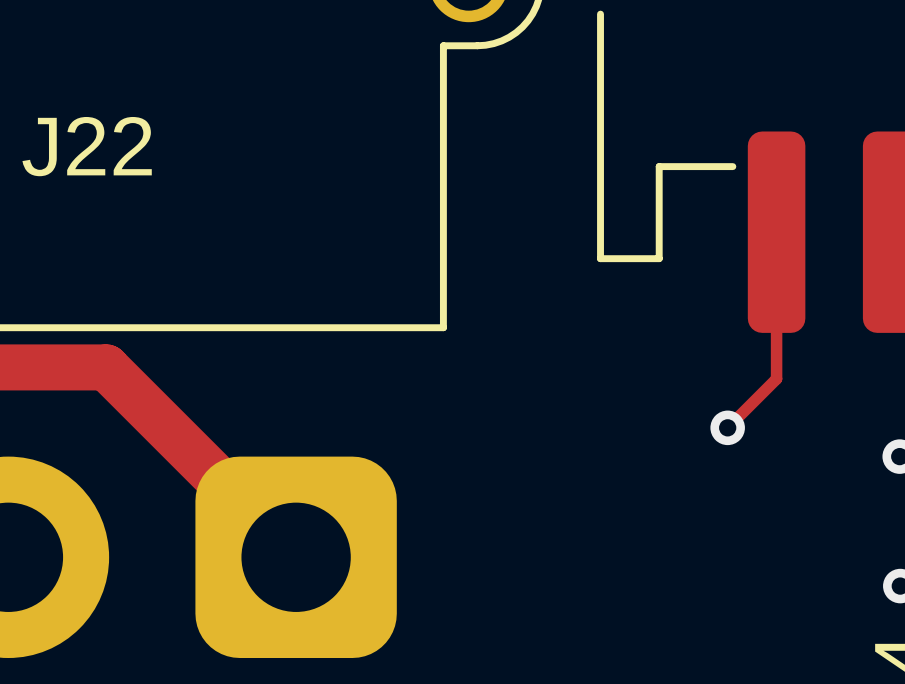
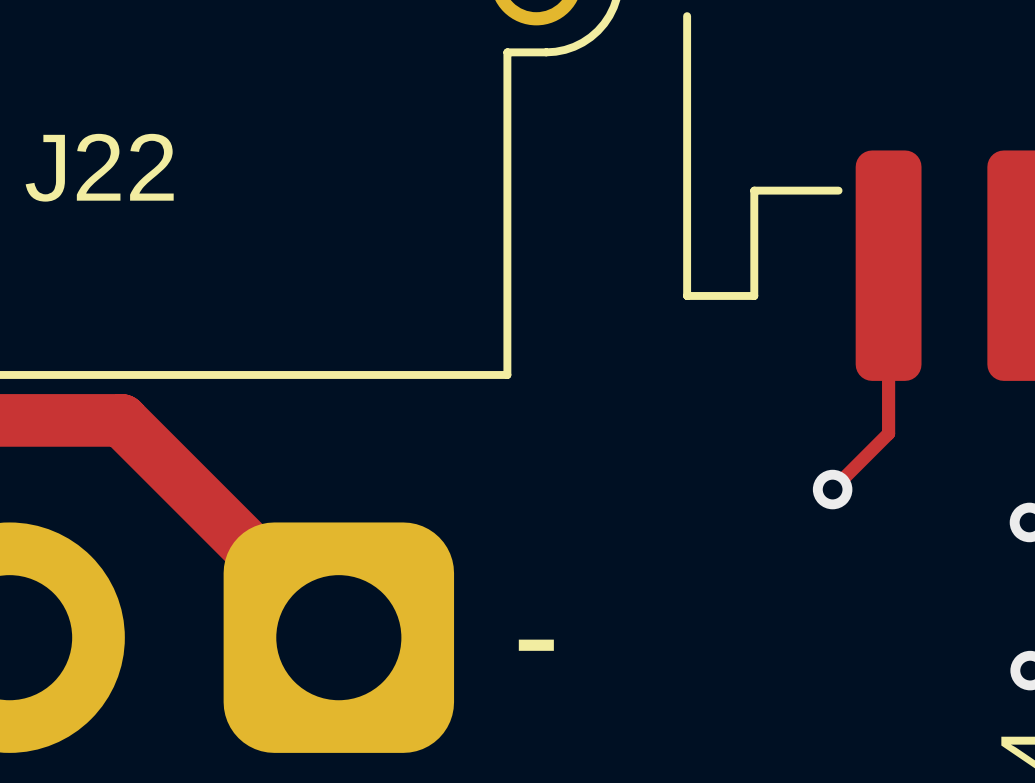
J22 text: none -> - (536, 645)

